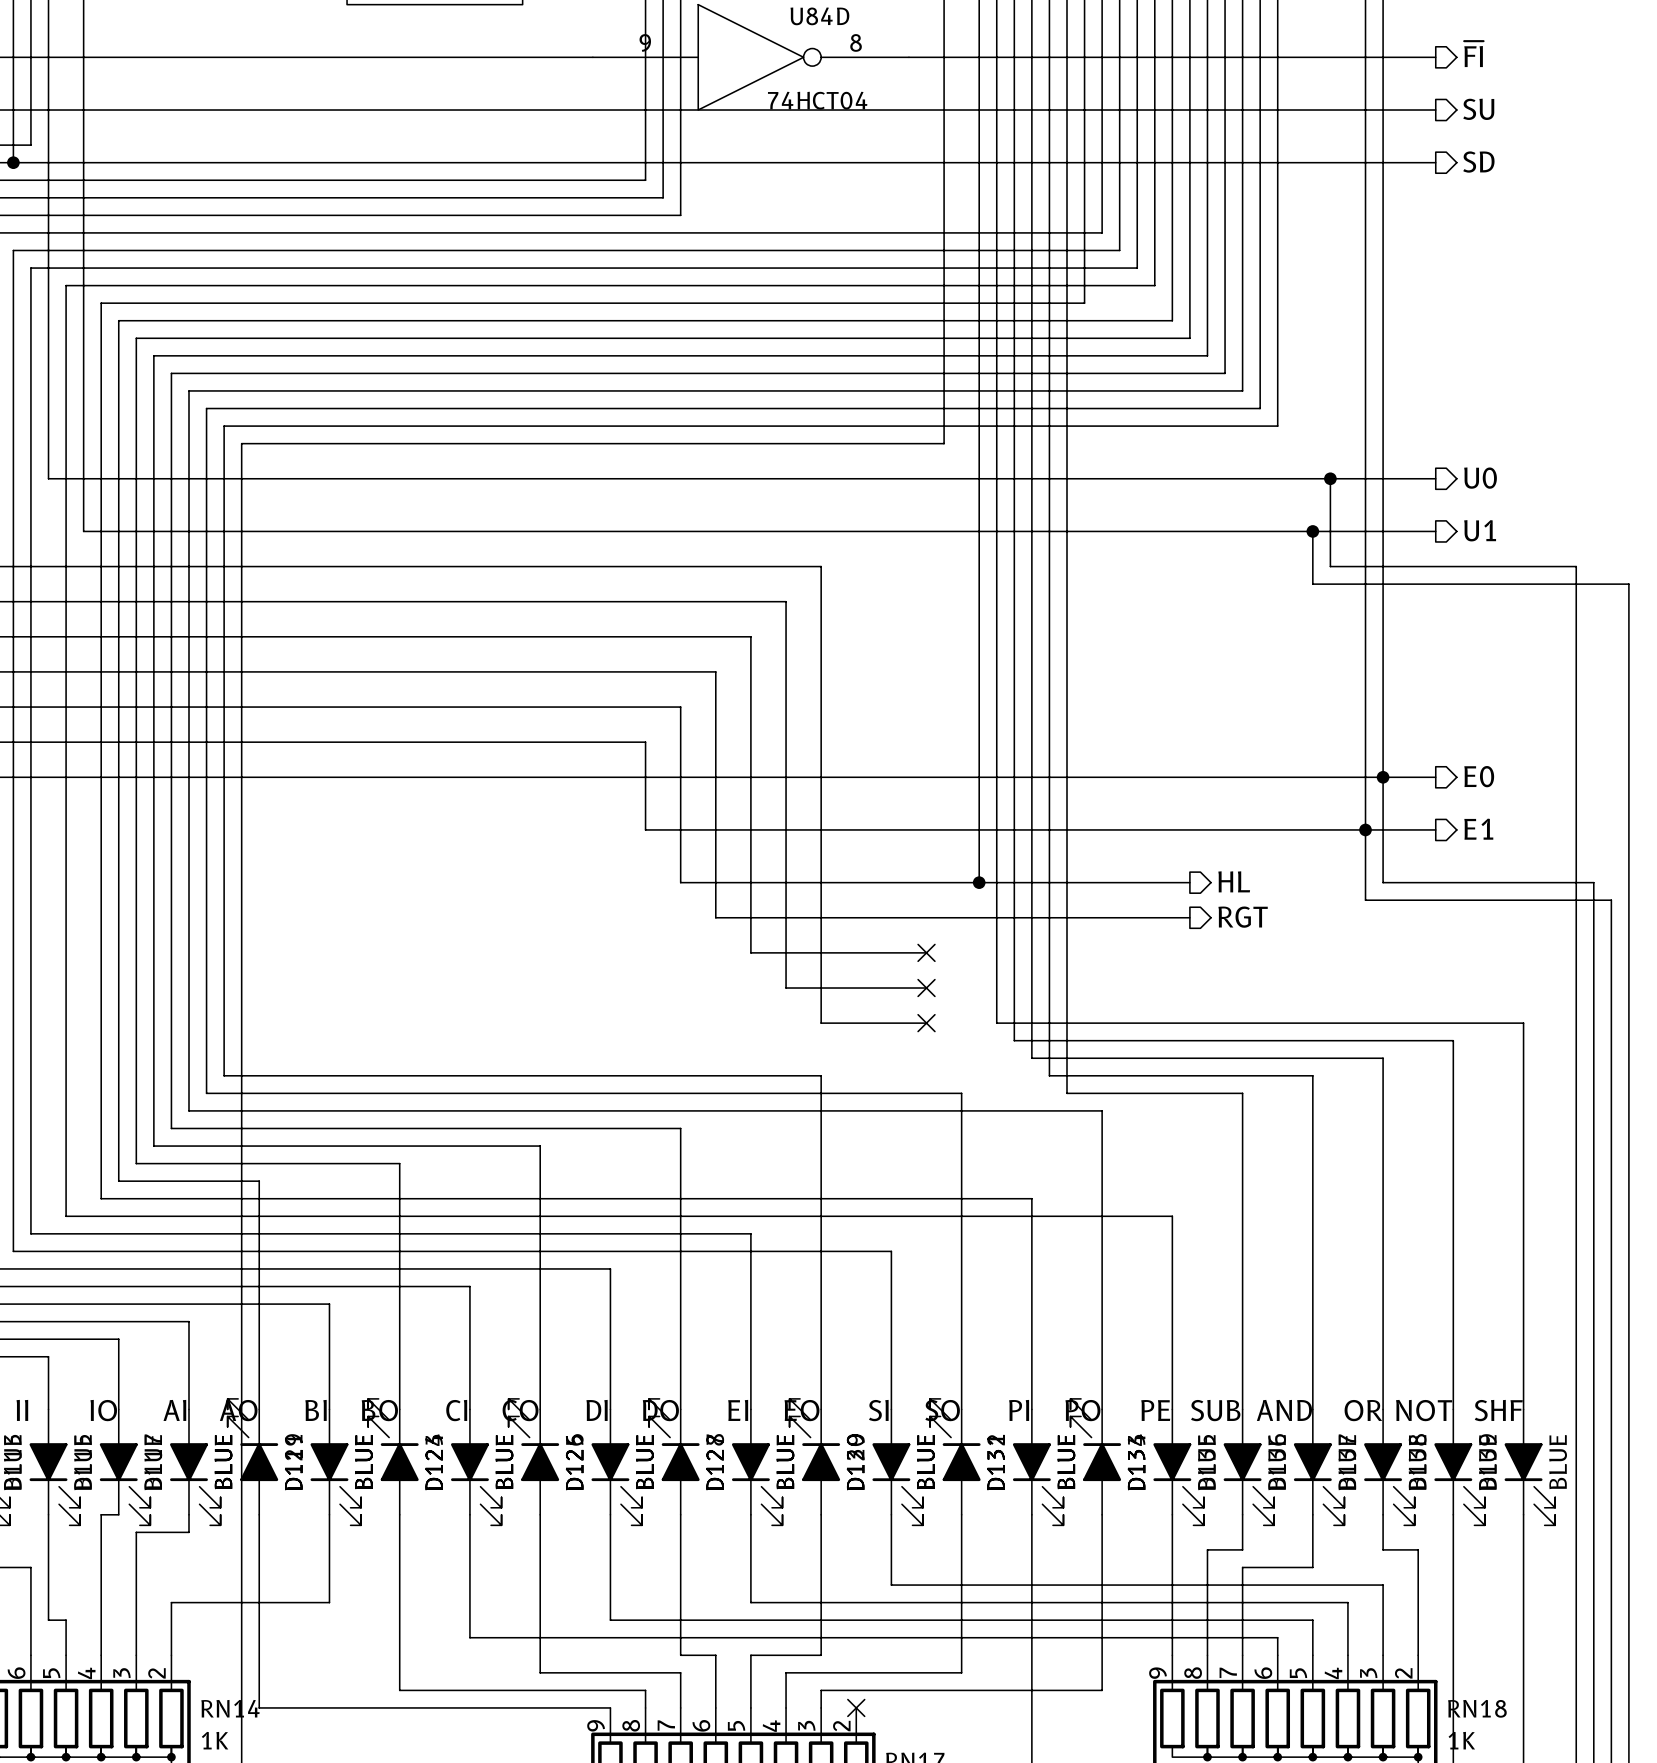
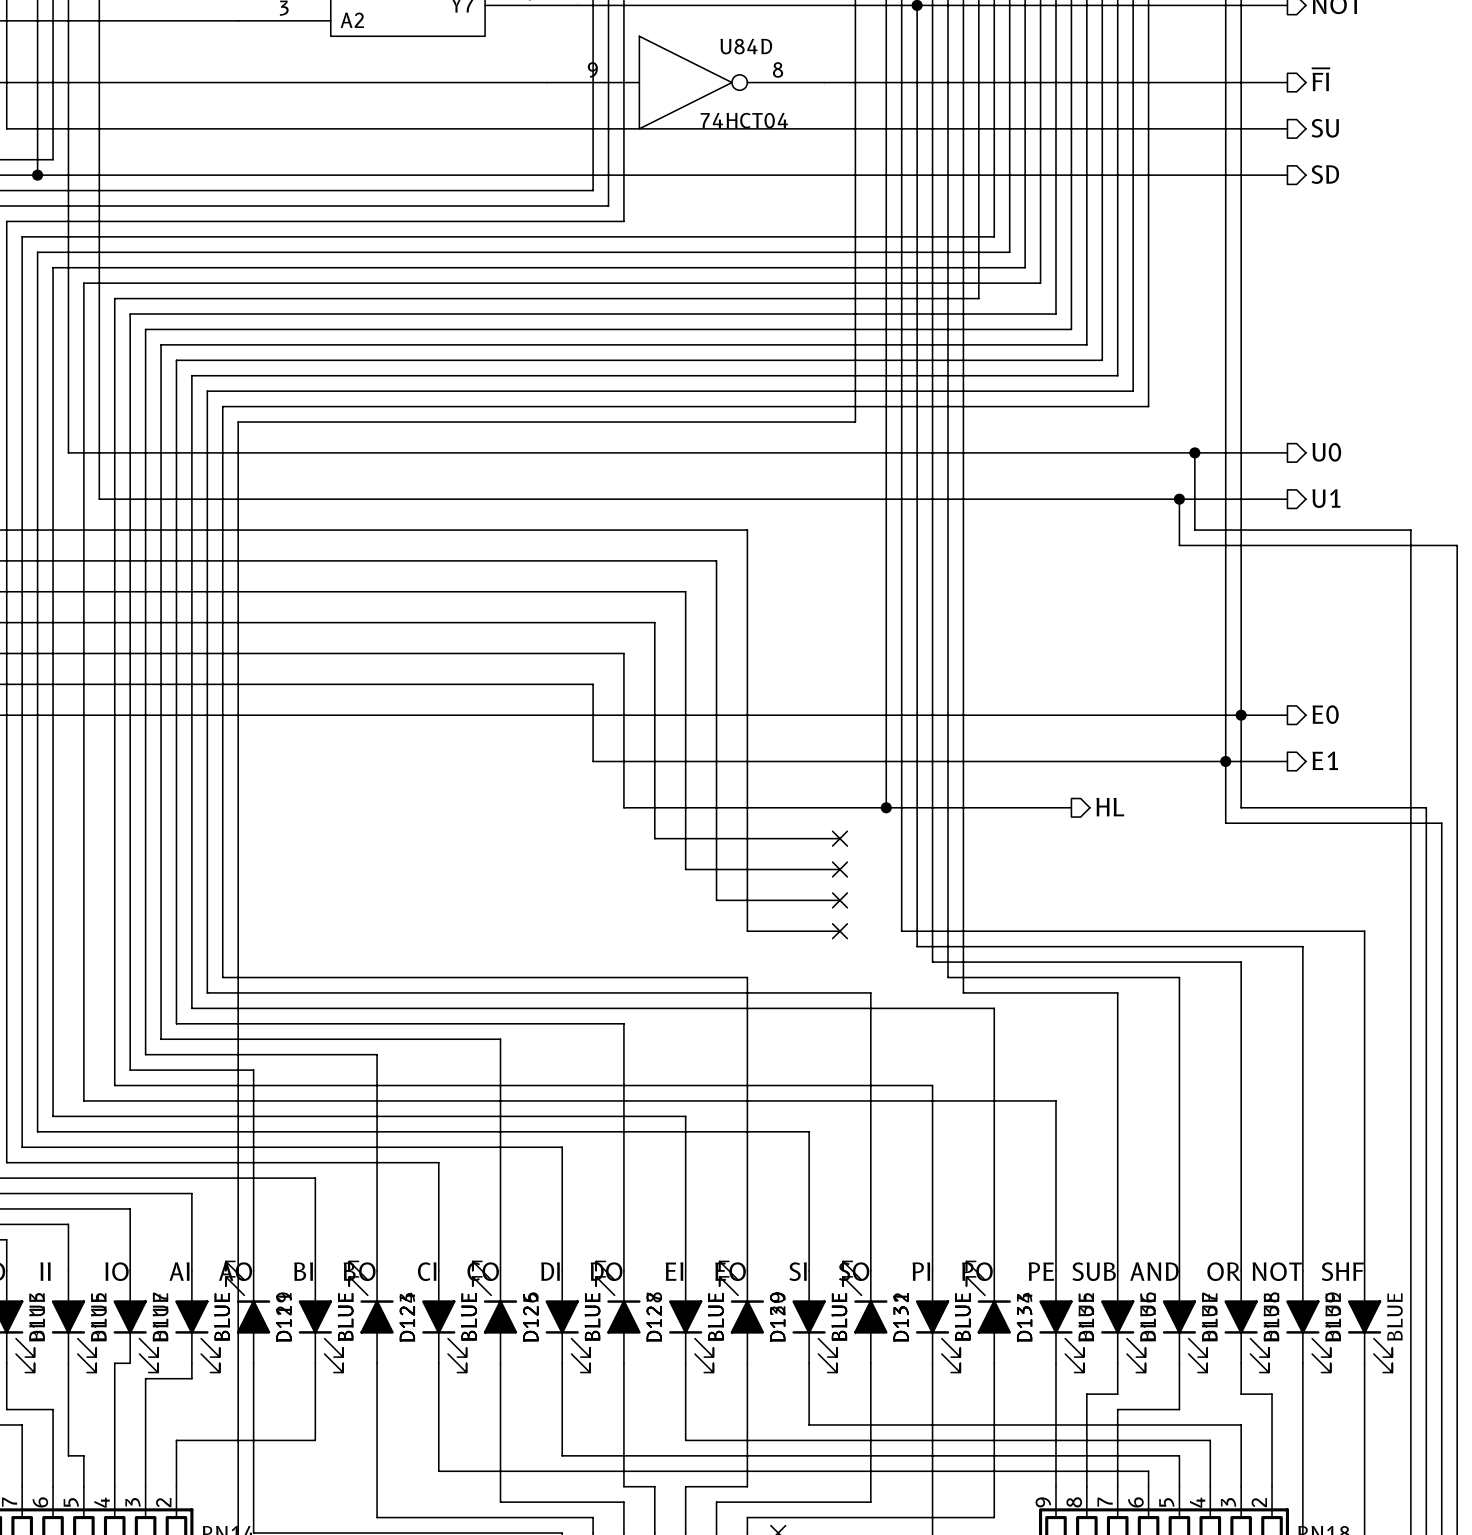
wire: (926, 917) (1189, 917) -> none
no-connect mark: none -> (839, 838)
hierarchical label: RGT (1243, 917) -> none

